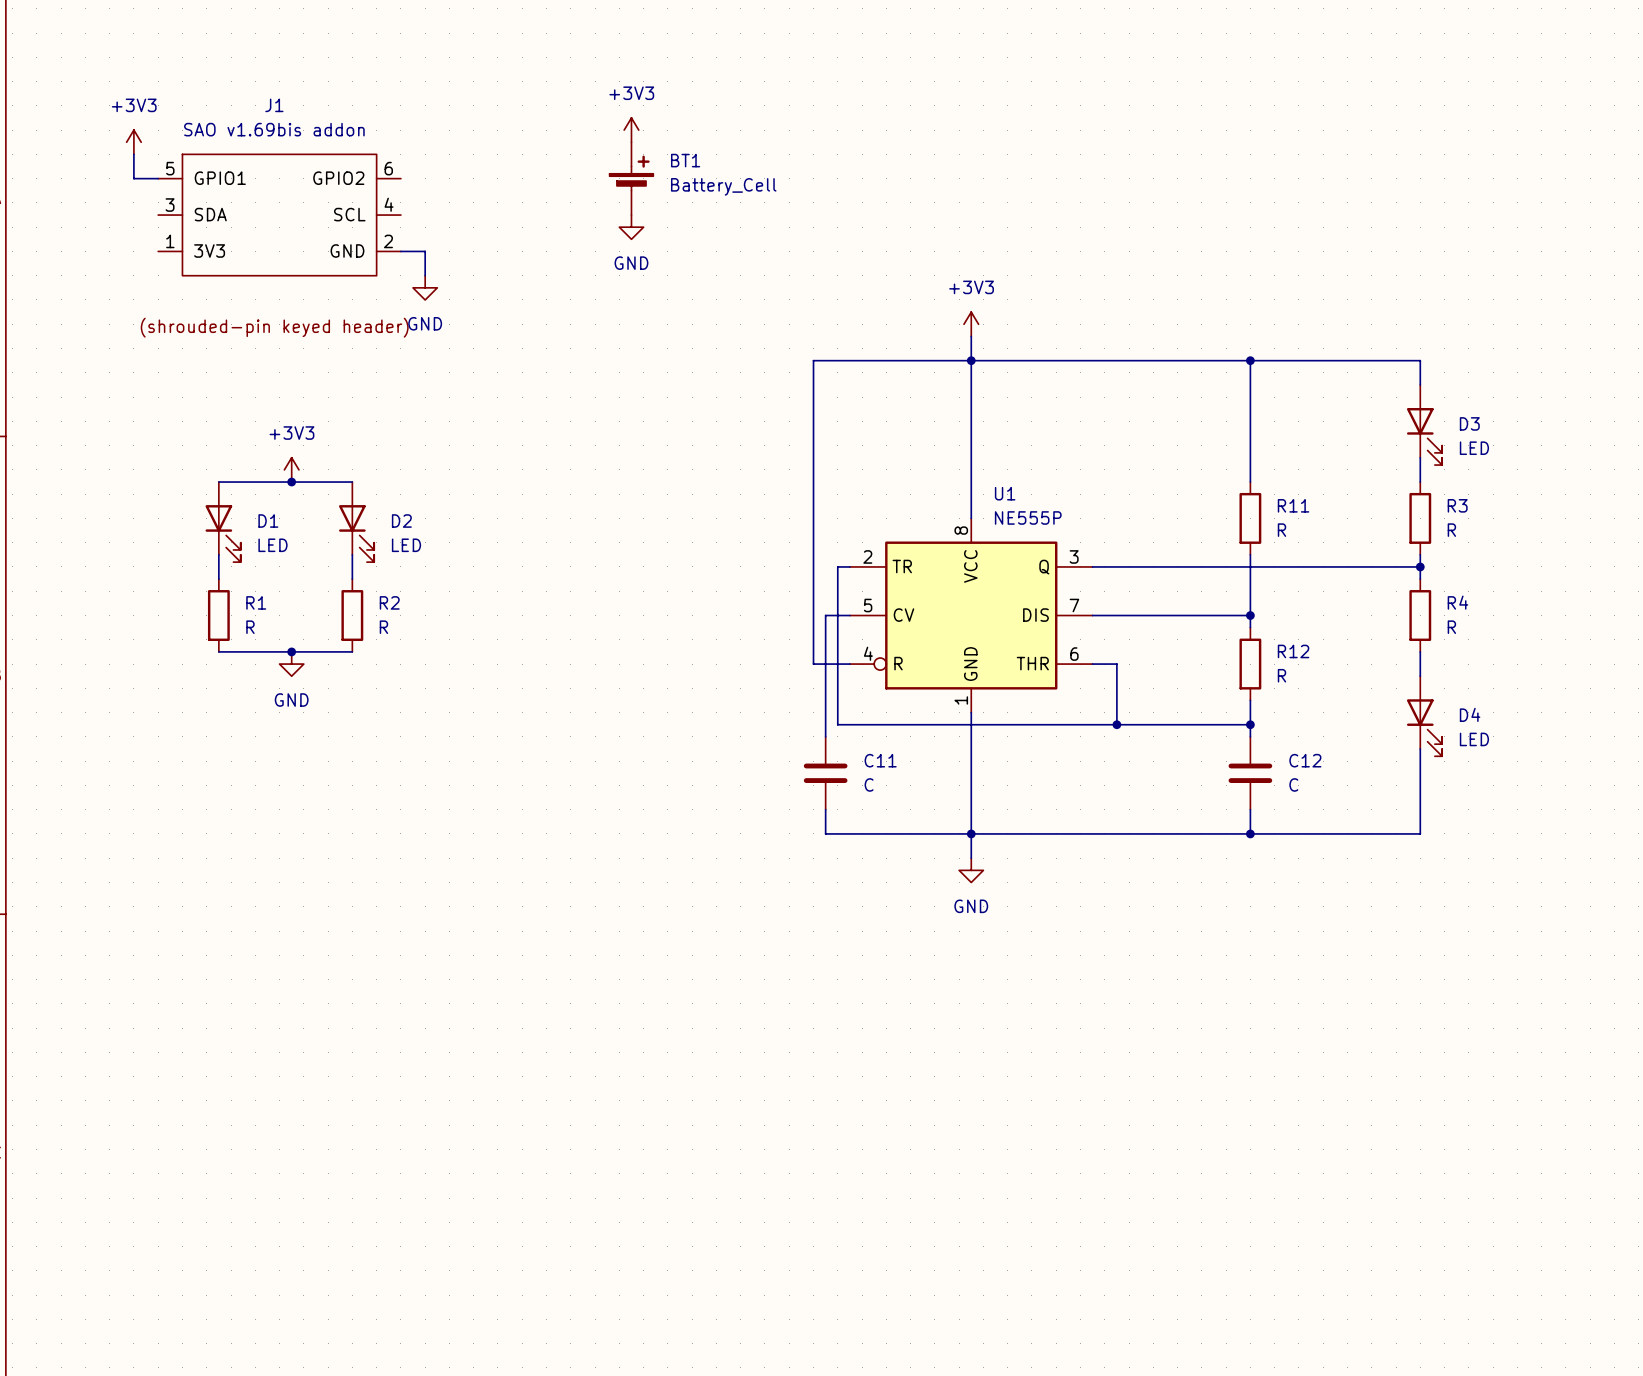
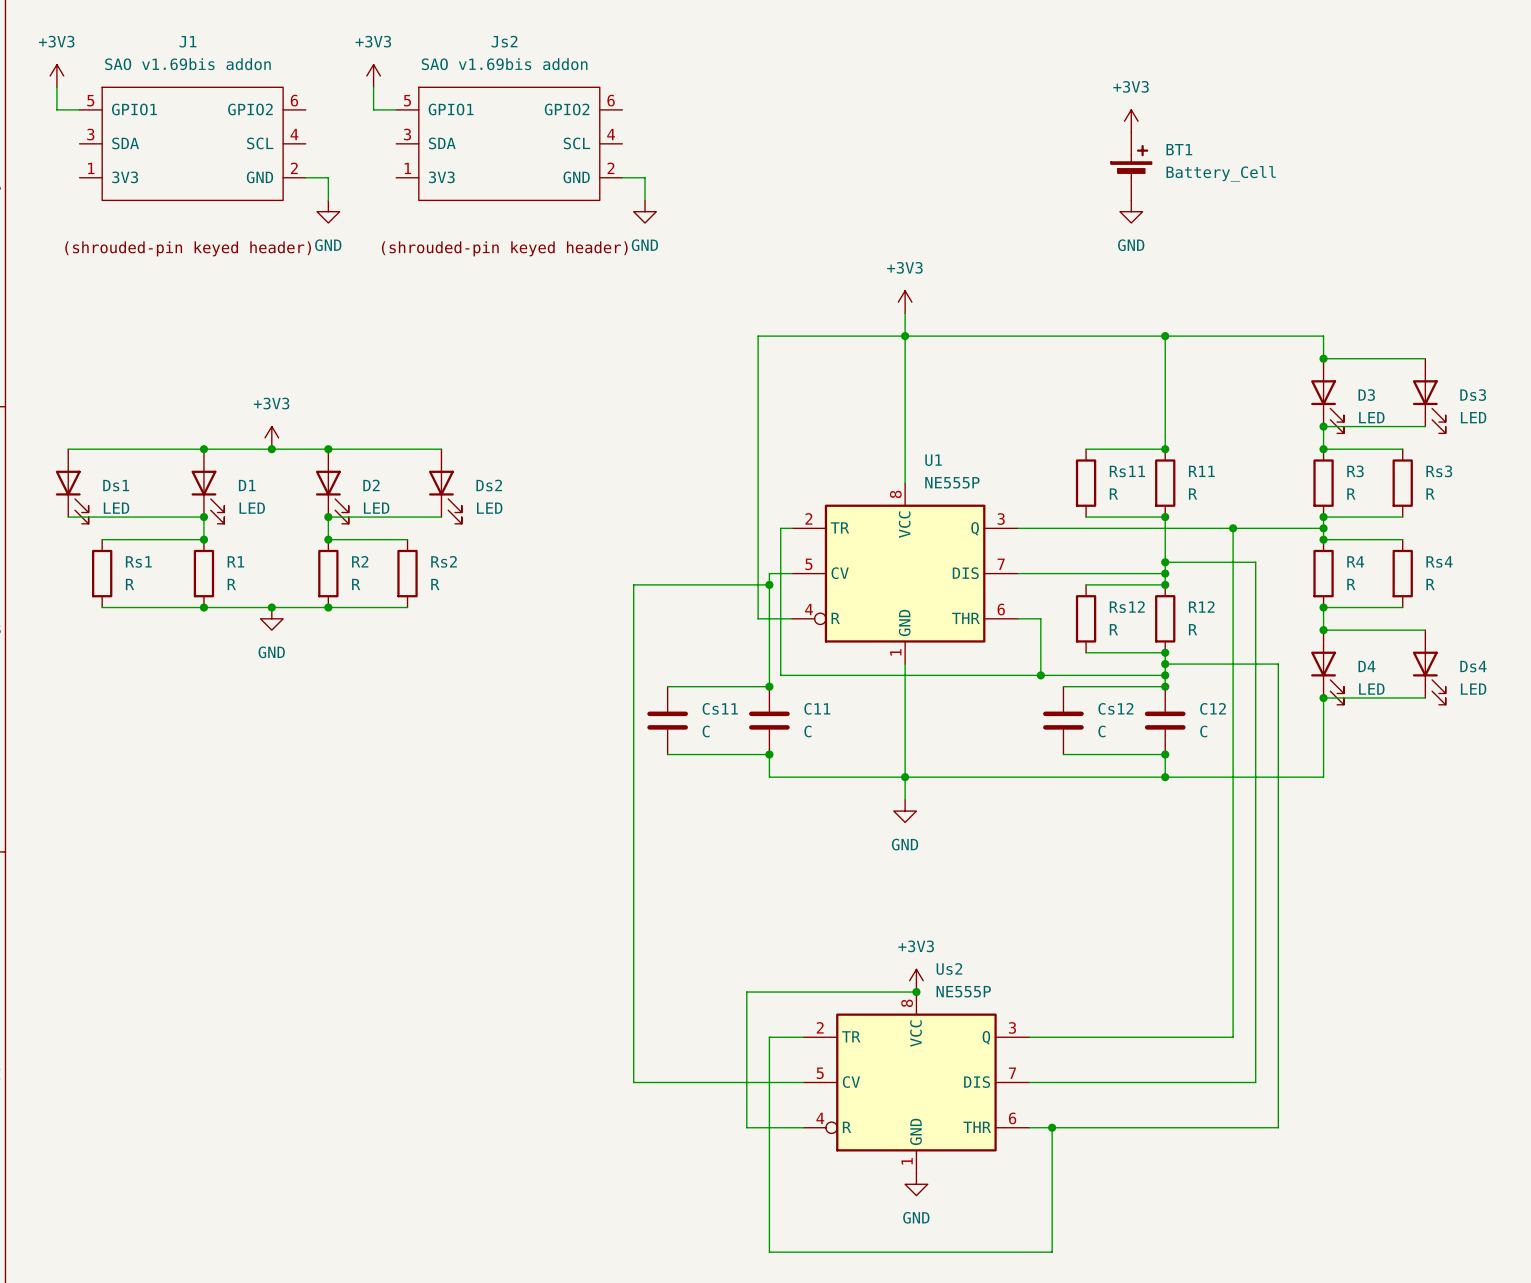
power symbol: none -> +3V3 (373, 75)
wire: none -> (373, 87) (373, 109) (396, 109)
power symbol: +3V3 (631, 130) -> none
power symbol: none -> +3V3 (1131, 121)
power symbol position: +3V3 (133, 142) -> +3V3 (56, 75)
wire: (133, 154) (133, 178) (158, 178) -> (56, 87) (56, 109) (79, 109)
Js2: none -> SAO v1.69bis addon (509, 143)
BT1 position: (631, 178) -> (1131, 166)
wire: none -> (622, 177) (645, 177) (645, 200)
J1 position: (279, 215) -> (192, 143)
power symbol position: GND (631, 227) -> GND (645, 211)
power symbol: none -> GND (1131, 211)
wire: (400, 251) (425, 251) (425, 275) -> (305, 177) (328, 177) (328, 200)
power symbol position: GND (425, 287) -> GND (328, 211)
wire: none -> (1323, 358) (1425, 358)
junction: none -> (1323, 358)
Ds3: none -> LED (1429, 396)
wire: none -> (1323, 426) (1425, 426)
junction: none -> (1323, 426)
wire: none -> (68, 449) (203, 449)
junction: none -> (203, 449)
wire: none -> (328, 449) (441, 449)
junction: none -> (328, 449)
wire: none -> (1086, 449) (1165, 449)
junction: none -> (1165, 449)
wire: none -> (1323, 449) (1402, 449)
junction: none -> (1323, 449)
Rs11: none -> R (1086, 483)
Rs3: none -> R (1402, 483)
Ds1: none -> LED (72, 486)
Ds2: none -> LED (445, 486)
wire: none -> (68, 517) (203, 517)
junction: none -> (203, 517)
wire: none -> (328, 517) (441, 517)
junction: none -> (328, 517)
wire: none -> (1086, 517) (1165, 517)
junction: none -> (1165, 517)
wire: none -> (1323, 517) (1402, 517)
junction: none -> (1323, 517)
wire: none -> (1233, 528) (1233, 1037) (1029, 1037)
junction: none -> (1233, 528)
wire: none -> (102, 539) (203, 539)
junction: none -> (203, 539)
wire: none -> (328, 539) (407, 539)
junction: none -> (328, 539)
wire: none -> (1323, 539) (1402, 539)
junction: none -> (1323, 539)
wire: none -> (1165, 562) (1255, 562) (1255, 1082) (1029, 1082)
junction: none -> (1165, 562)
Rs1: none -> R (102, 573)
Rs2: none -> R (407, 573)
Rs4: none -> R (1402, 573)
wire: none -> (769, 584) (633, 584) (633, 1082) (803, 1082)
junction: none -> (769, 584)
wire: none -> (1086, 584) (1165, 584)
junction: none -> (1165, 584)
wire: none -> (102, 607) (203, 607)
junction: none -> (203, 607)
wire: none -> (328, 607) (407, 607)
junction: none -> (328, 607)
wire: none -> (1323, 607) (1402, 607)
junction: none -> (1323, 607)
Rs12: none -> R (1086, 618)
wire: none -> (1323, 630) (1425, 630)
junction: none -> (1323, 630)
wire: none -> (1086, 652) (1165, 652)
junction: none -> (1165, 652)
wire: none -> (1165, 664) (1278, 664) (1278, 1127) (1029, 1127)
junction: none -> (1165, 664)
Ds4: none -> LED (1429, 667)
wire: none -> (667, 686) (769, 686)
junction: none -> (769, 686)
wire: none -> (1063, 686) (1165, 686)
junction: none -> (1165, 686)
wire: none -> (1323, 697) (1425, 697)
junction: none -> (1323, 697)
Cs11: none -> C (667, 720)
Cs12: none -> C (1063, 720)
wire: none -> (667, 754) (769, 754)
junction: none -> (769, 754)
wire: none -> (1063, 754) (1165, 754)
junction: none -> (1165, 754)
power symbol: none -> +3V3 (916, 980)
wire: none -> (916, 992) (746, 992) (746, 1127) (803, 1127)
junction: none -> (916, 992)
wire: none -> (803, 1037) (769, 1037) (769, 1252) (1052, 1252) (1052, 1127)
Us2: none -> NE555P (916, 1082)
junction: none -> (1052, 1127)
power symbol: none -> GND (916, 1184)

